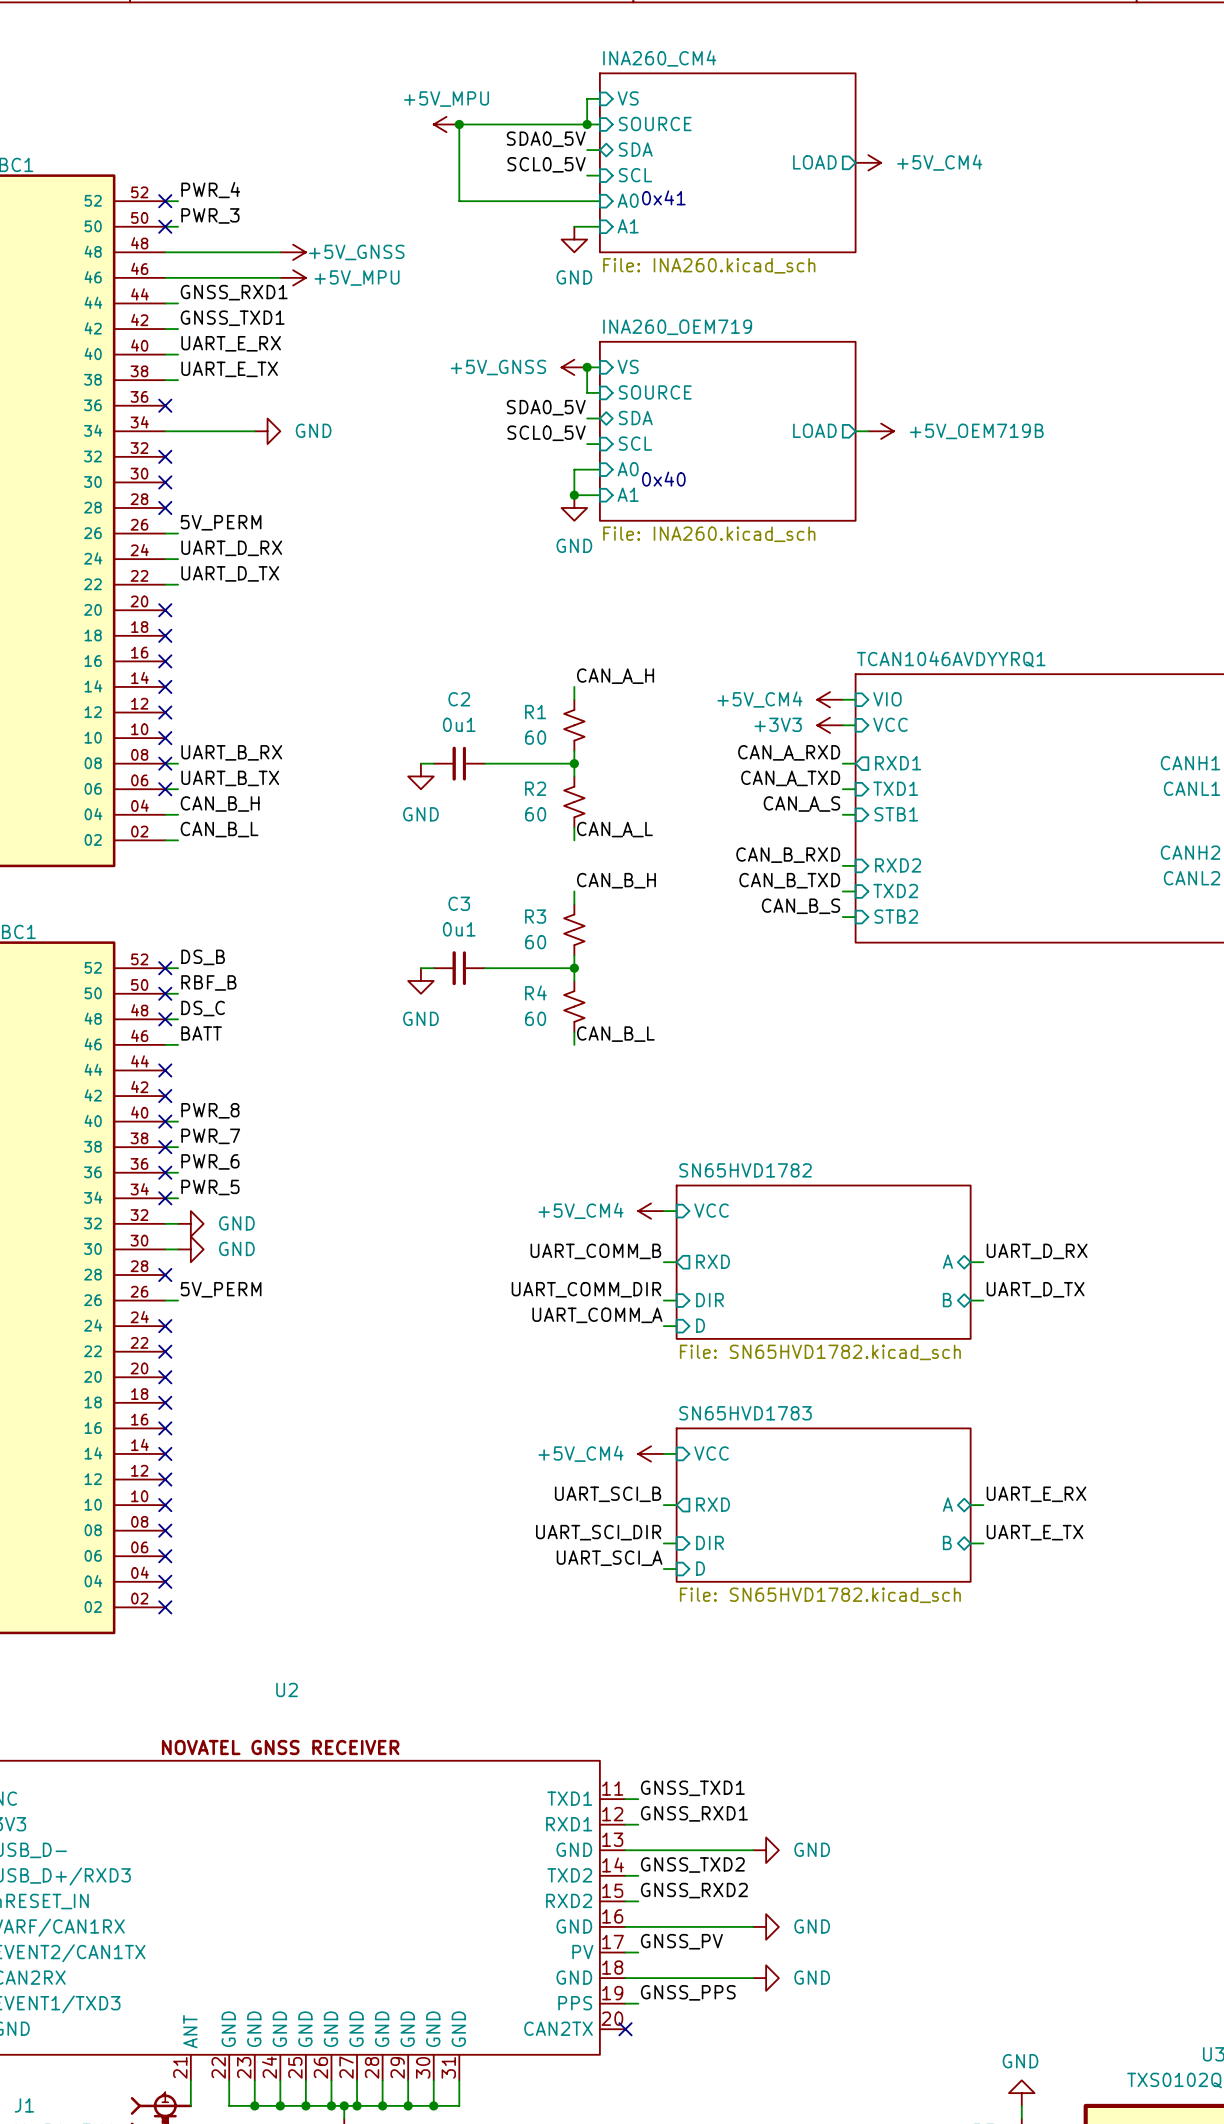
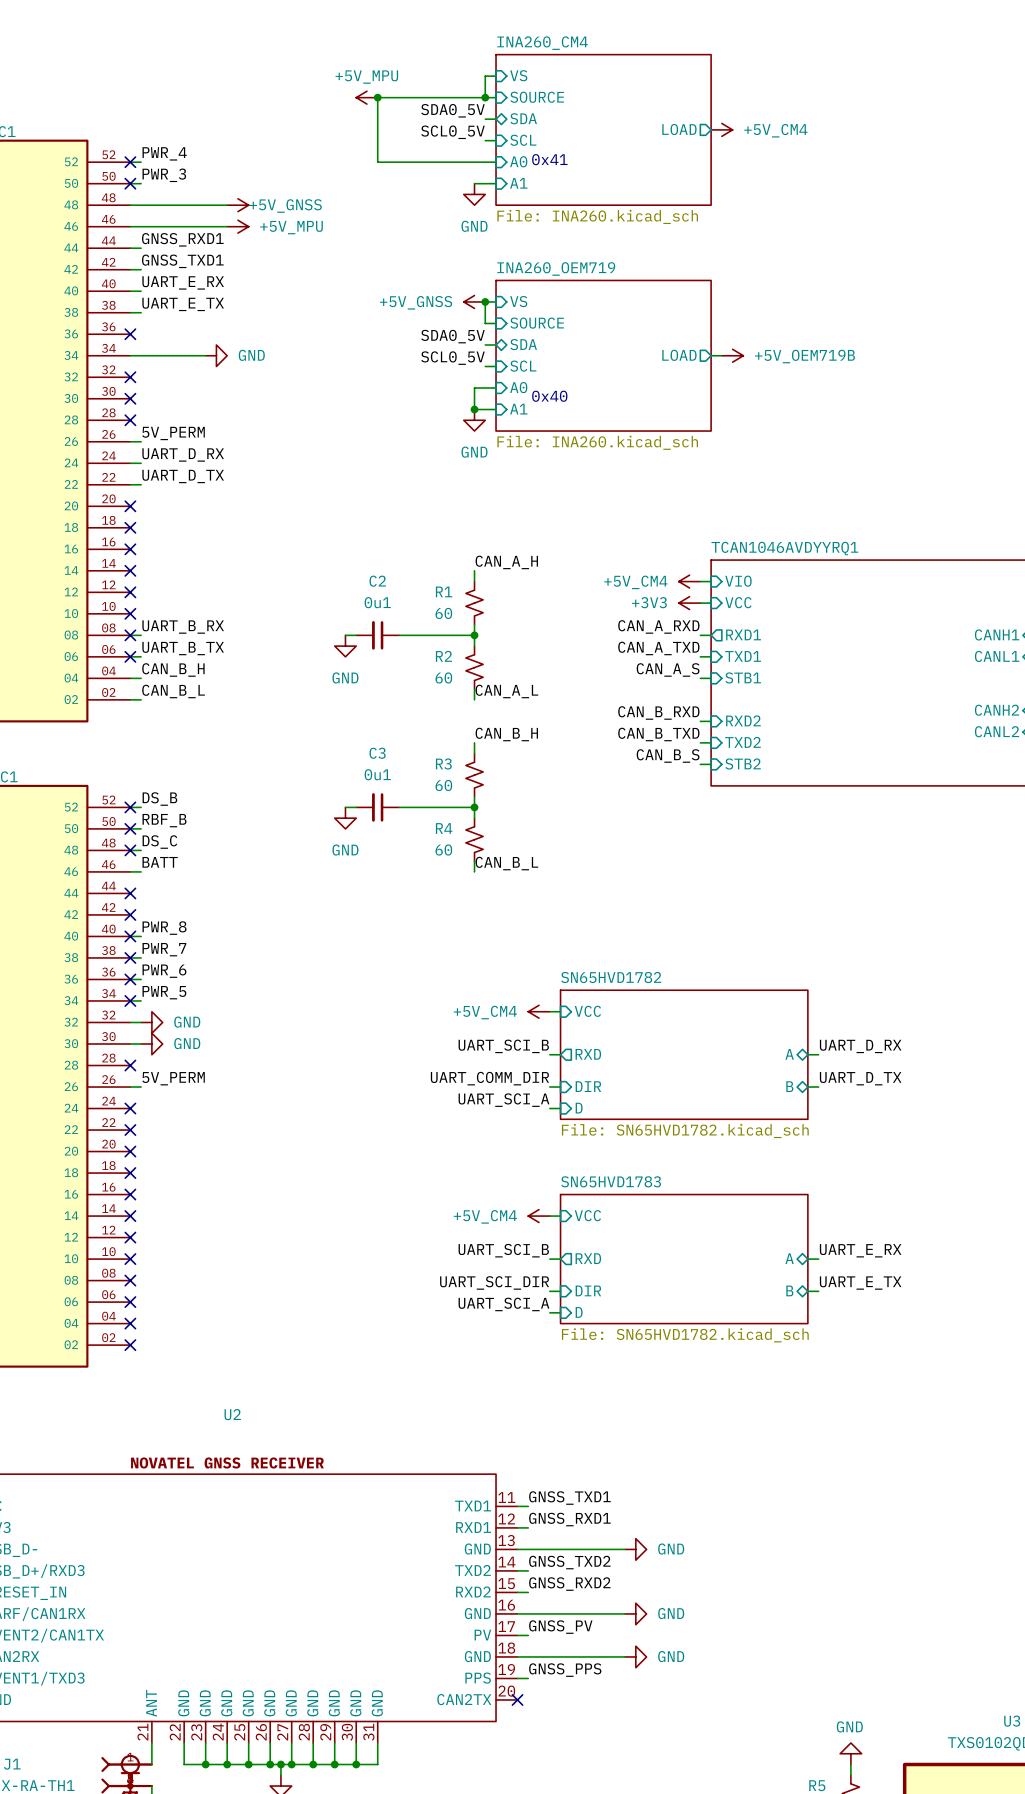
label: UART_COMM_B (595, 1251) -> UART_SCI_B (503, 1046)
label: UART_COMM_A (597, 1315) -> UART_SCI_A (503, 1100)

